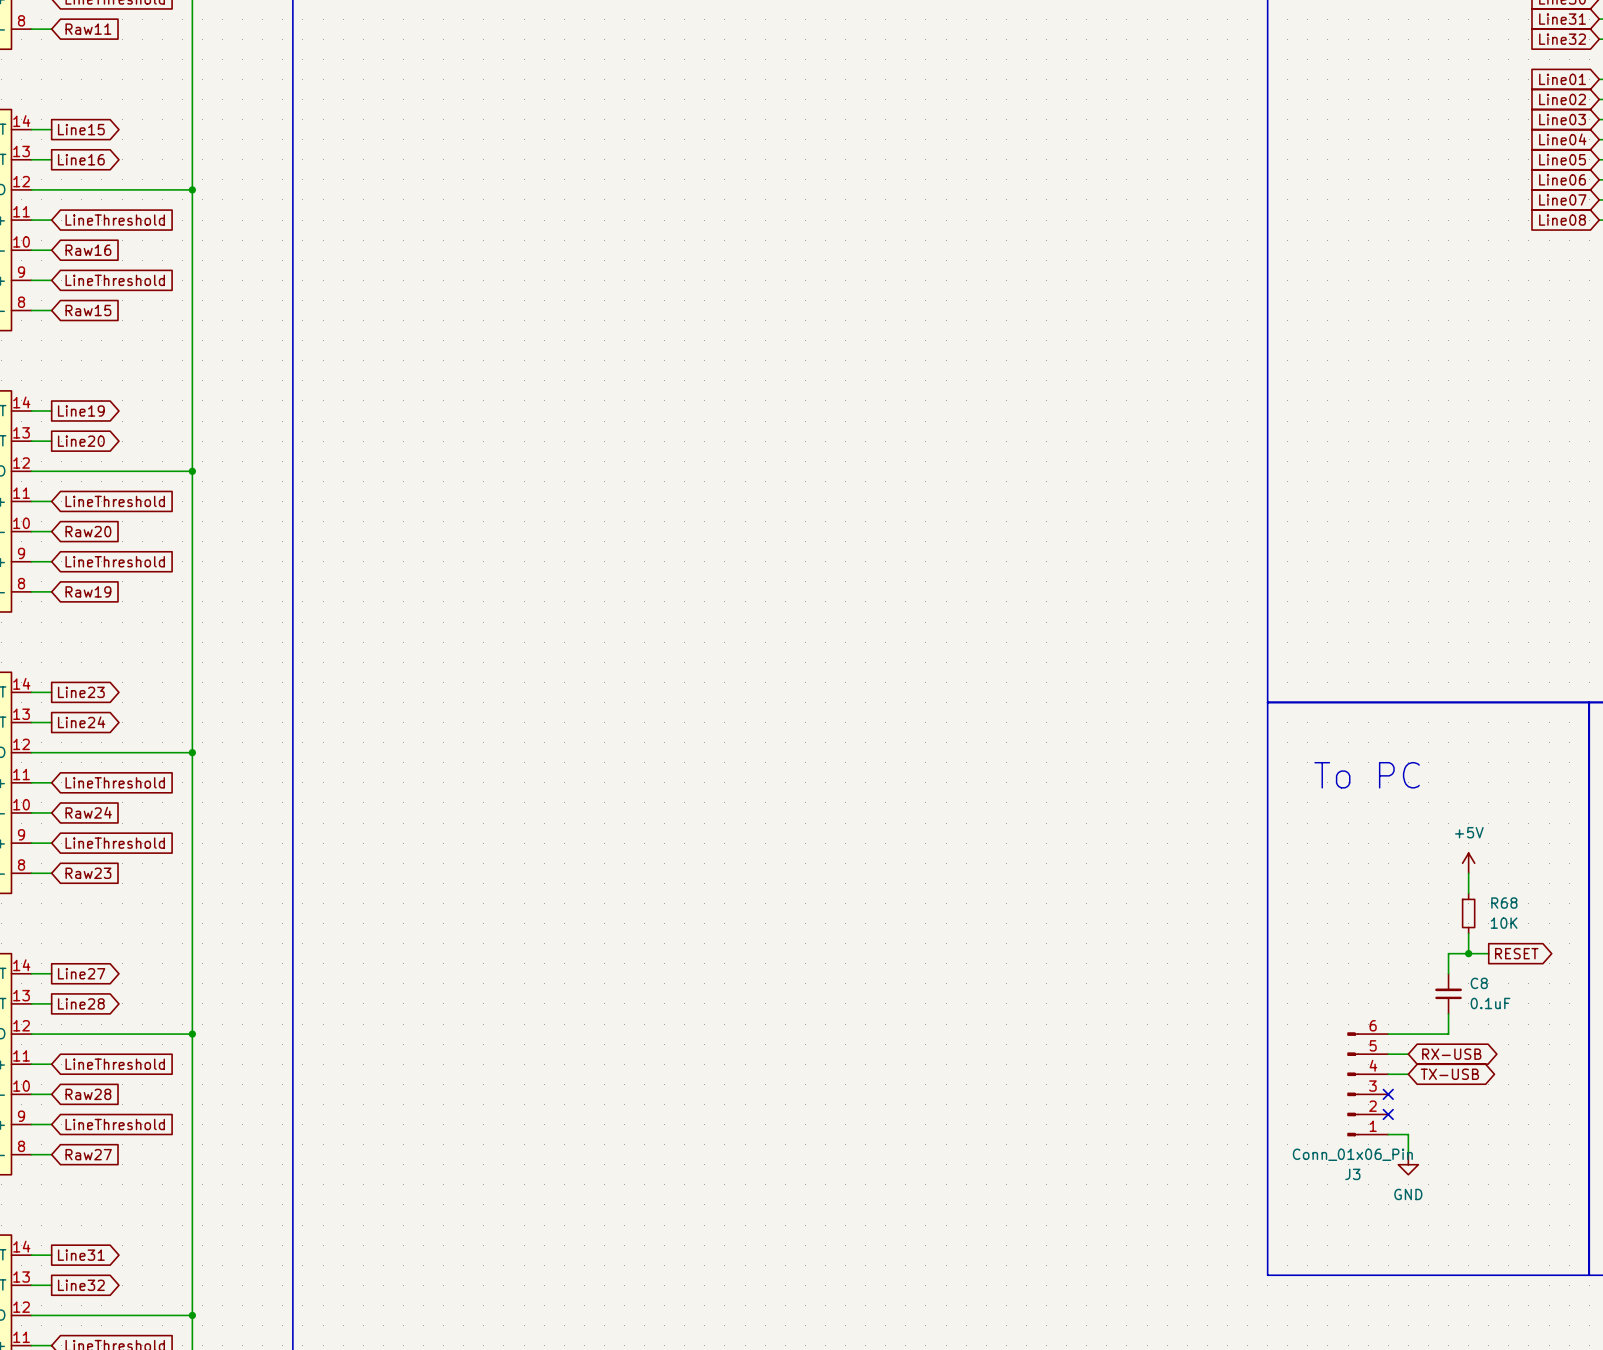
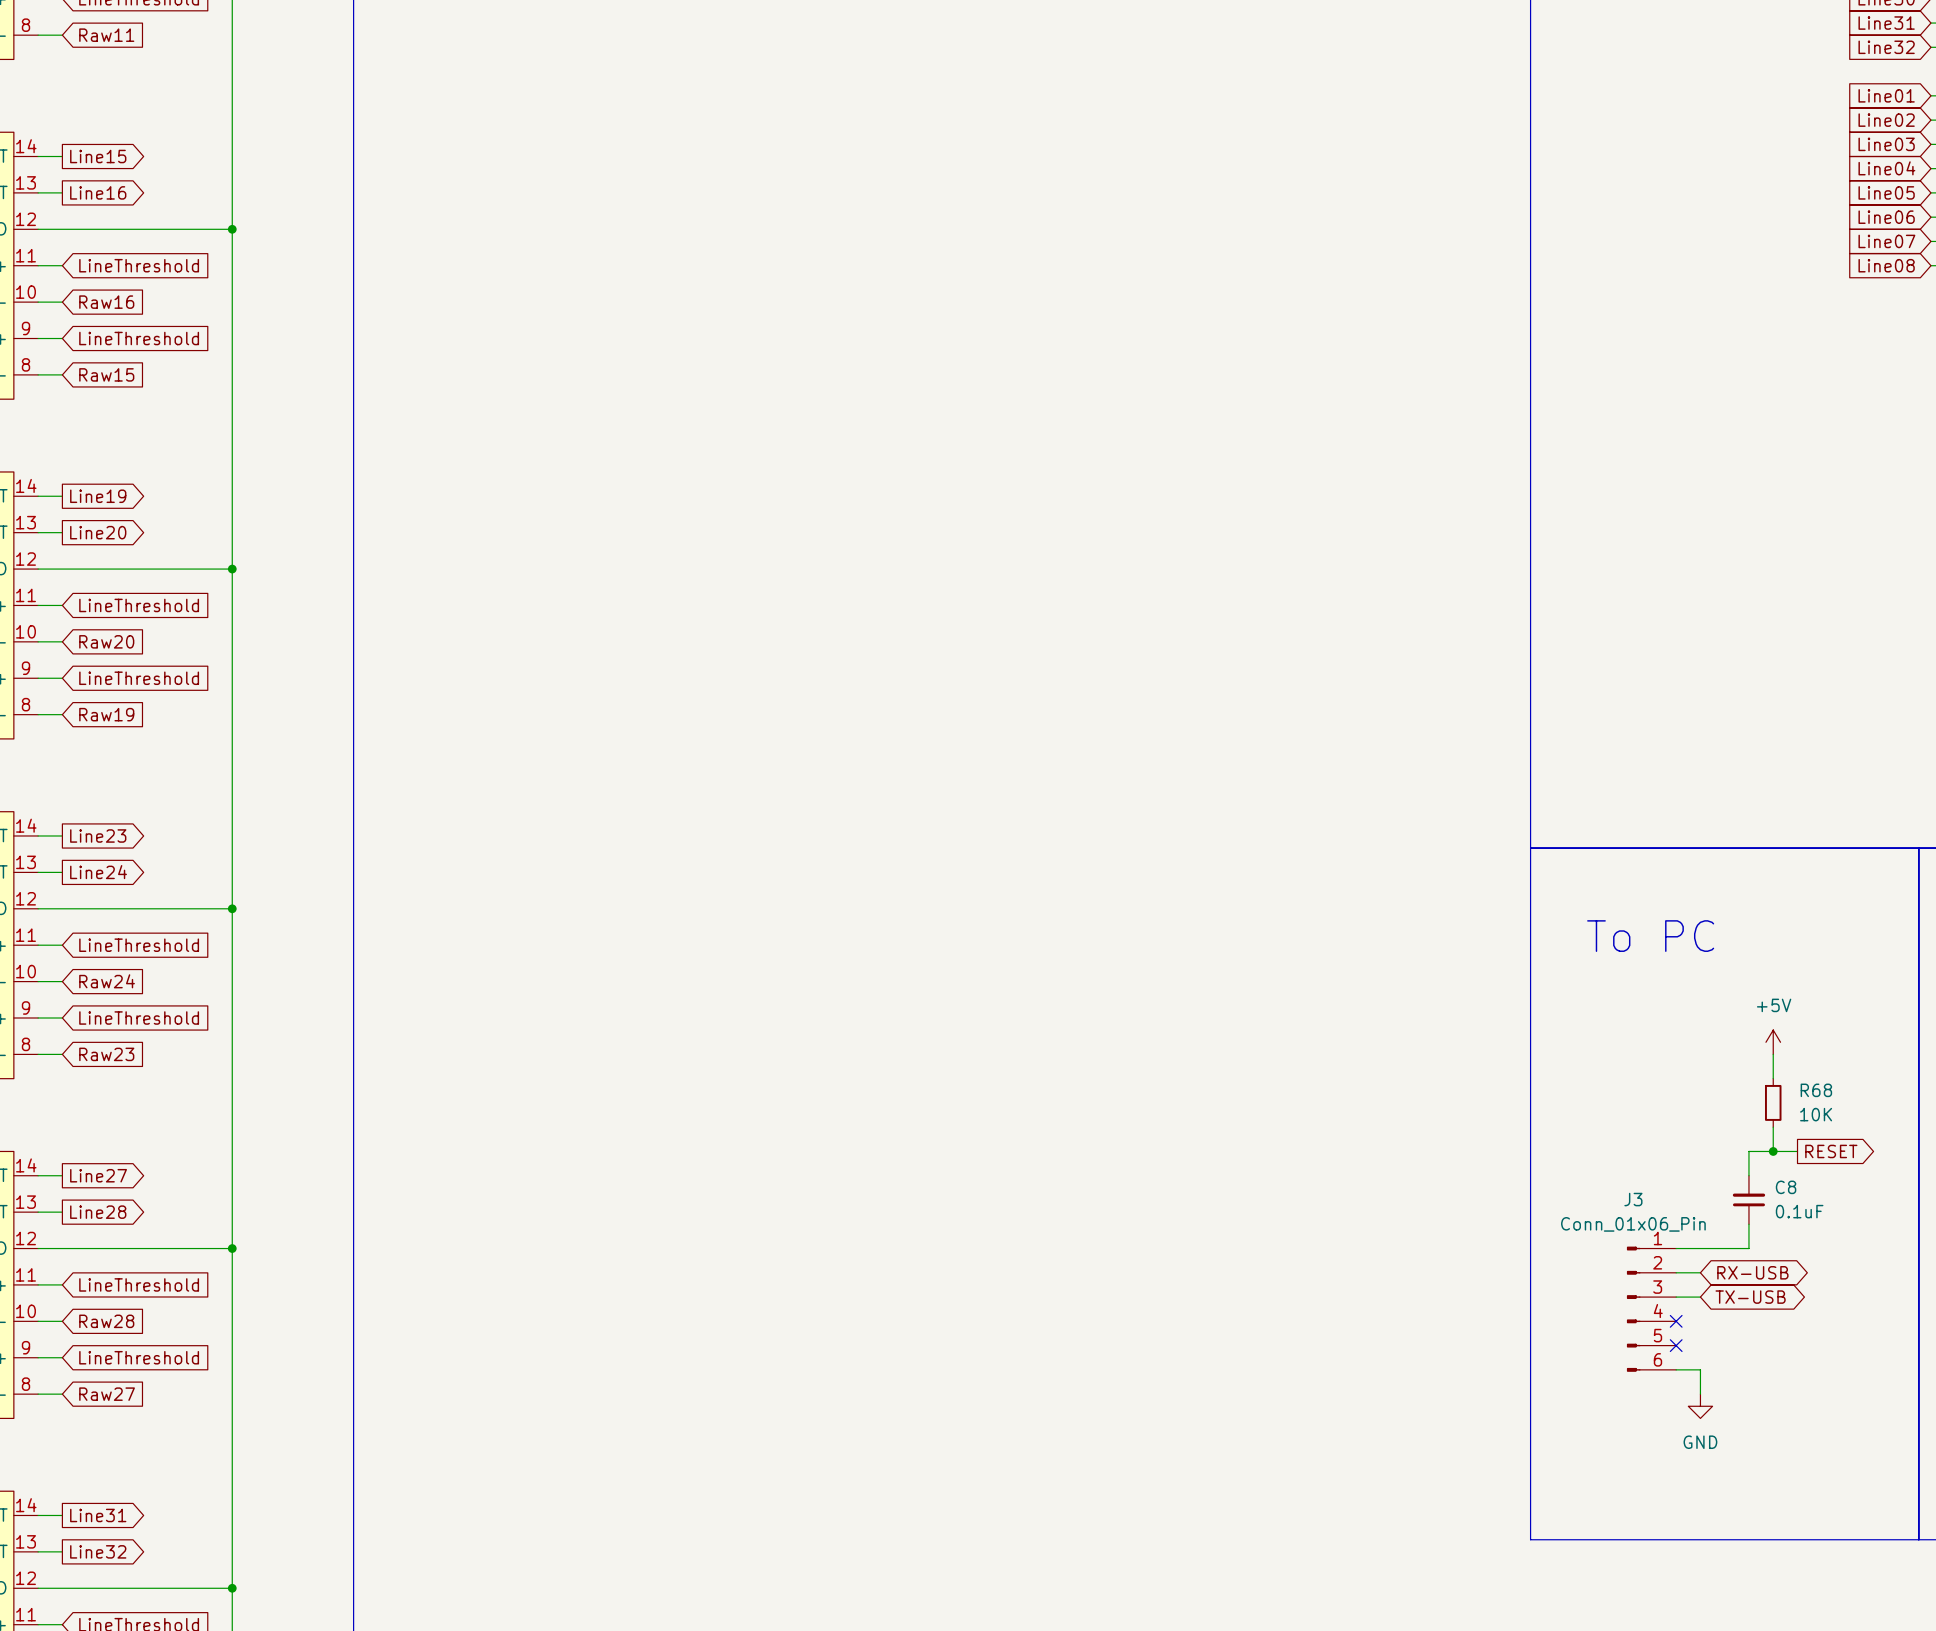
J3 flip: as is (1353, 1084) -> up-down (1633, 1309)

